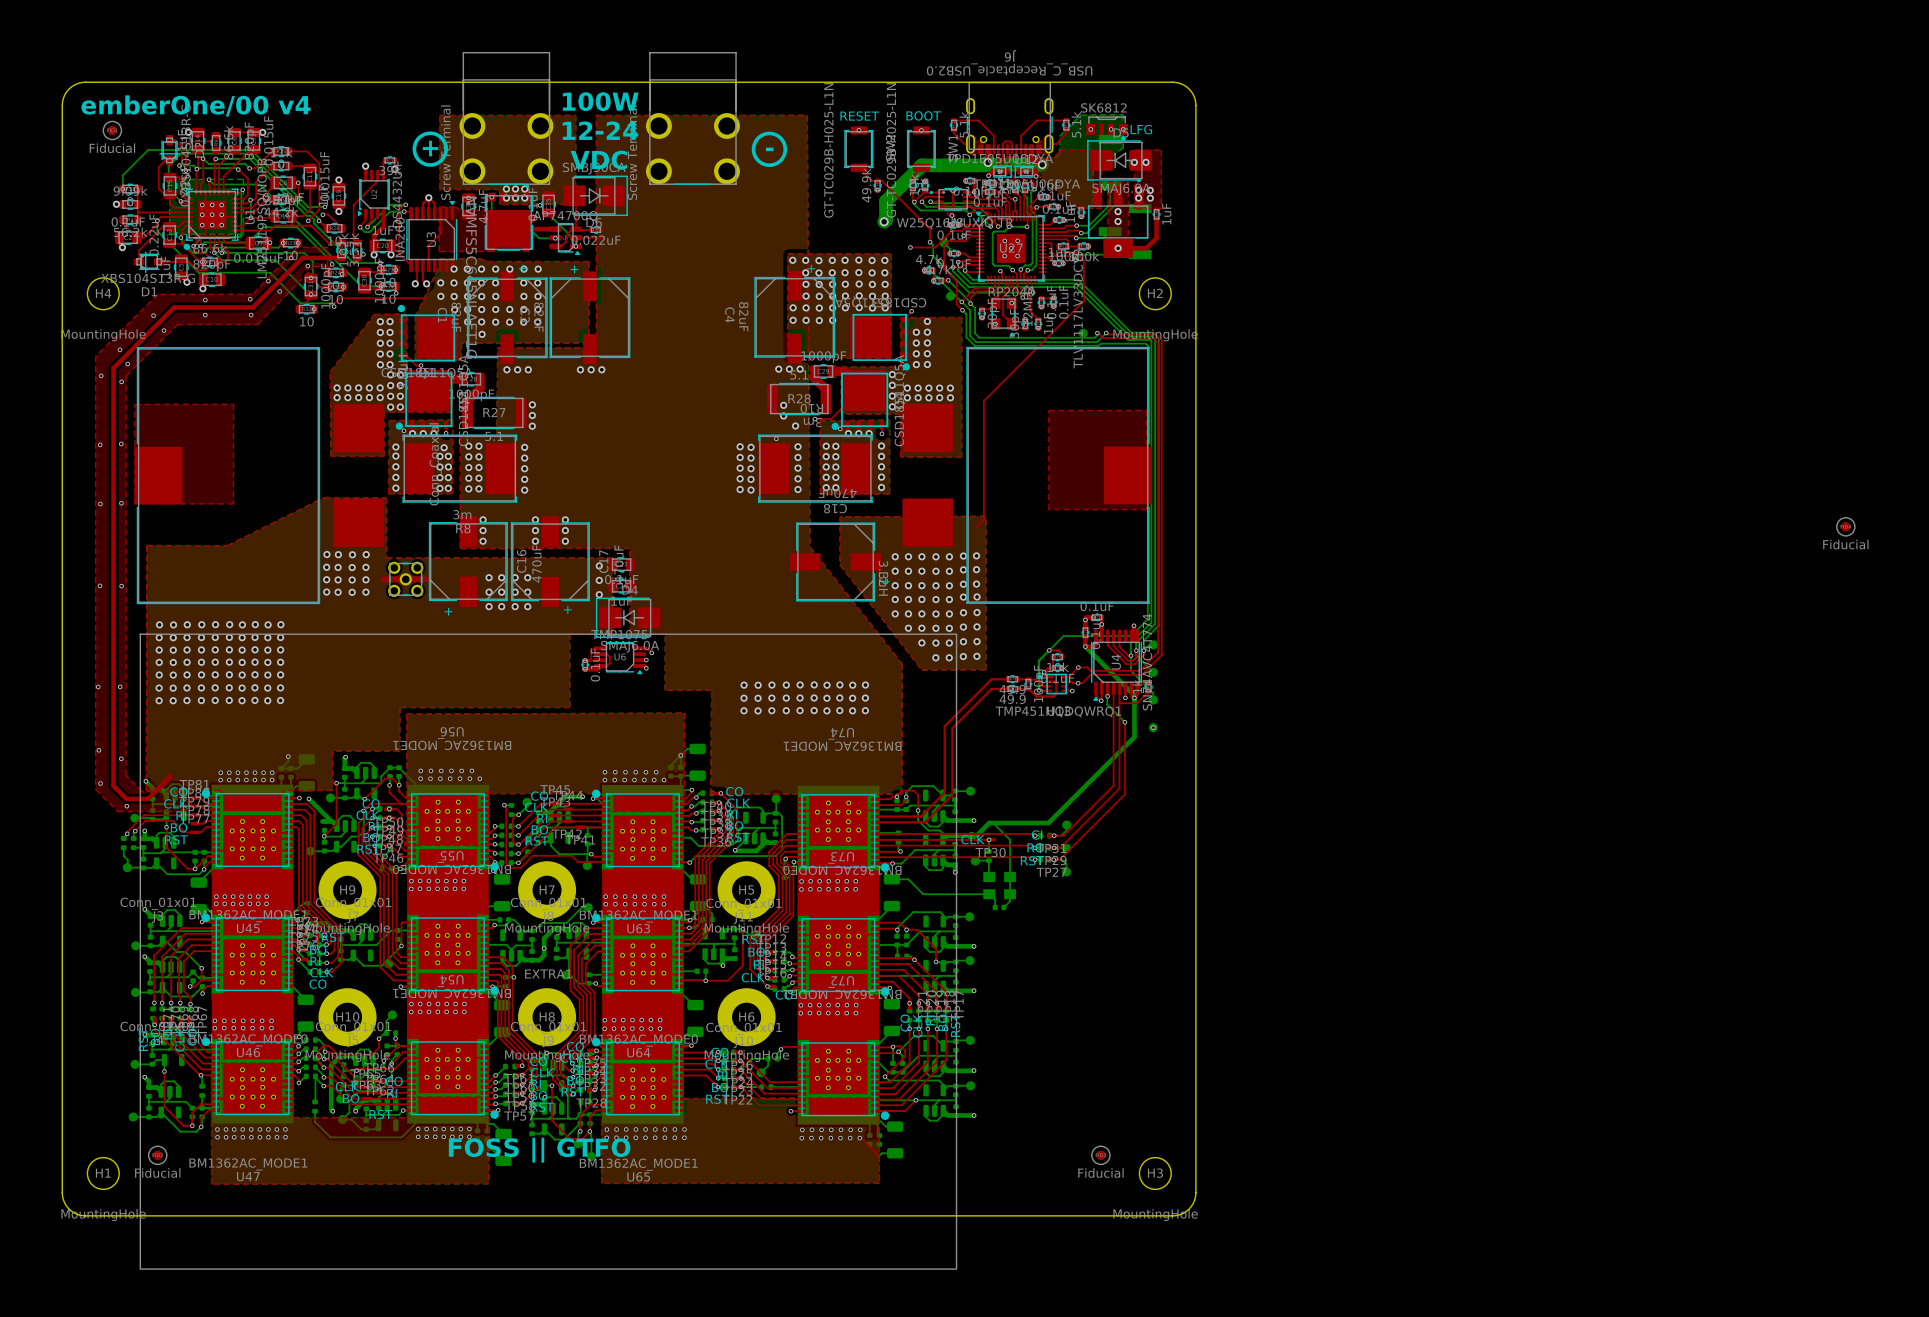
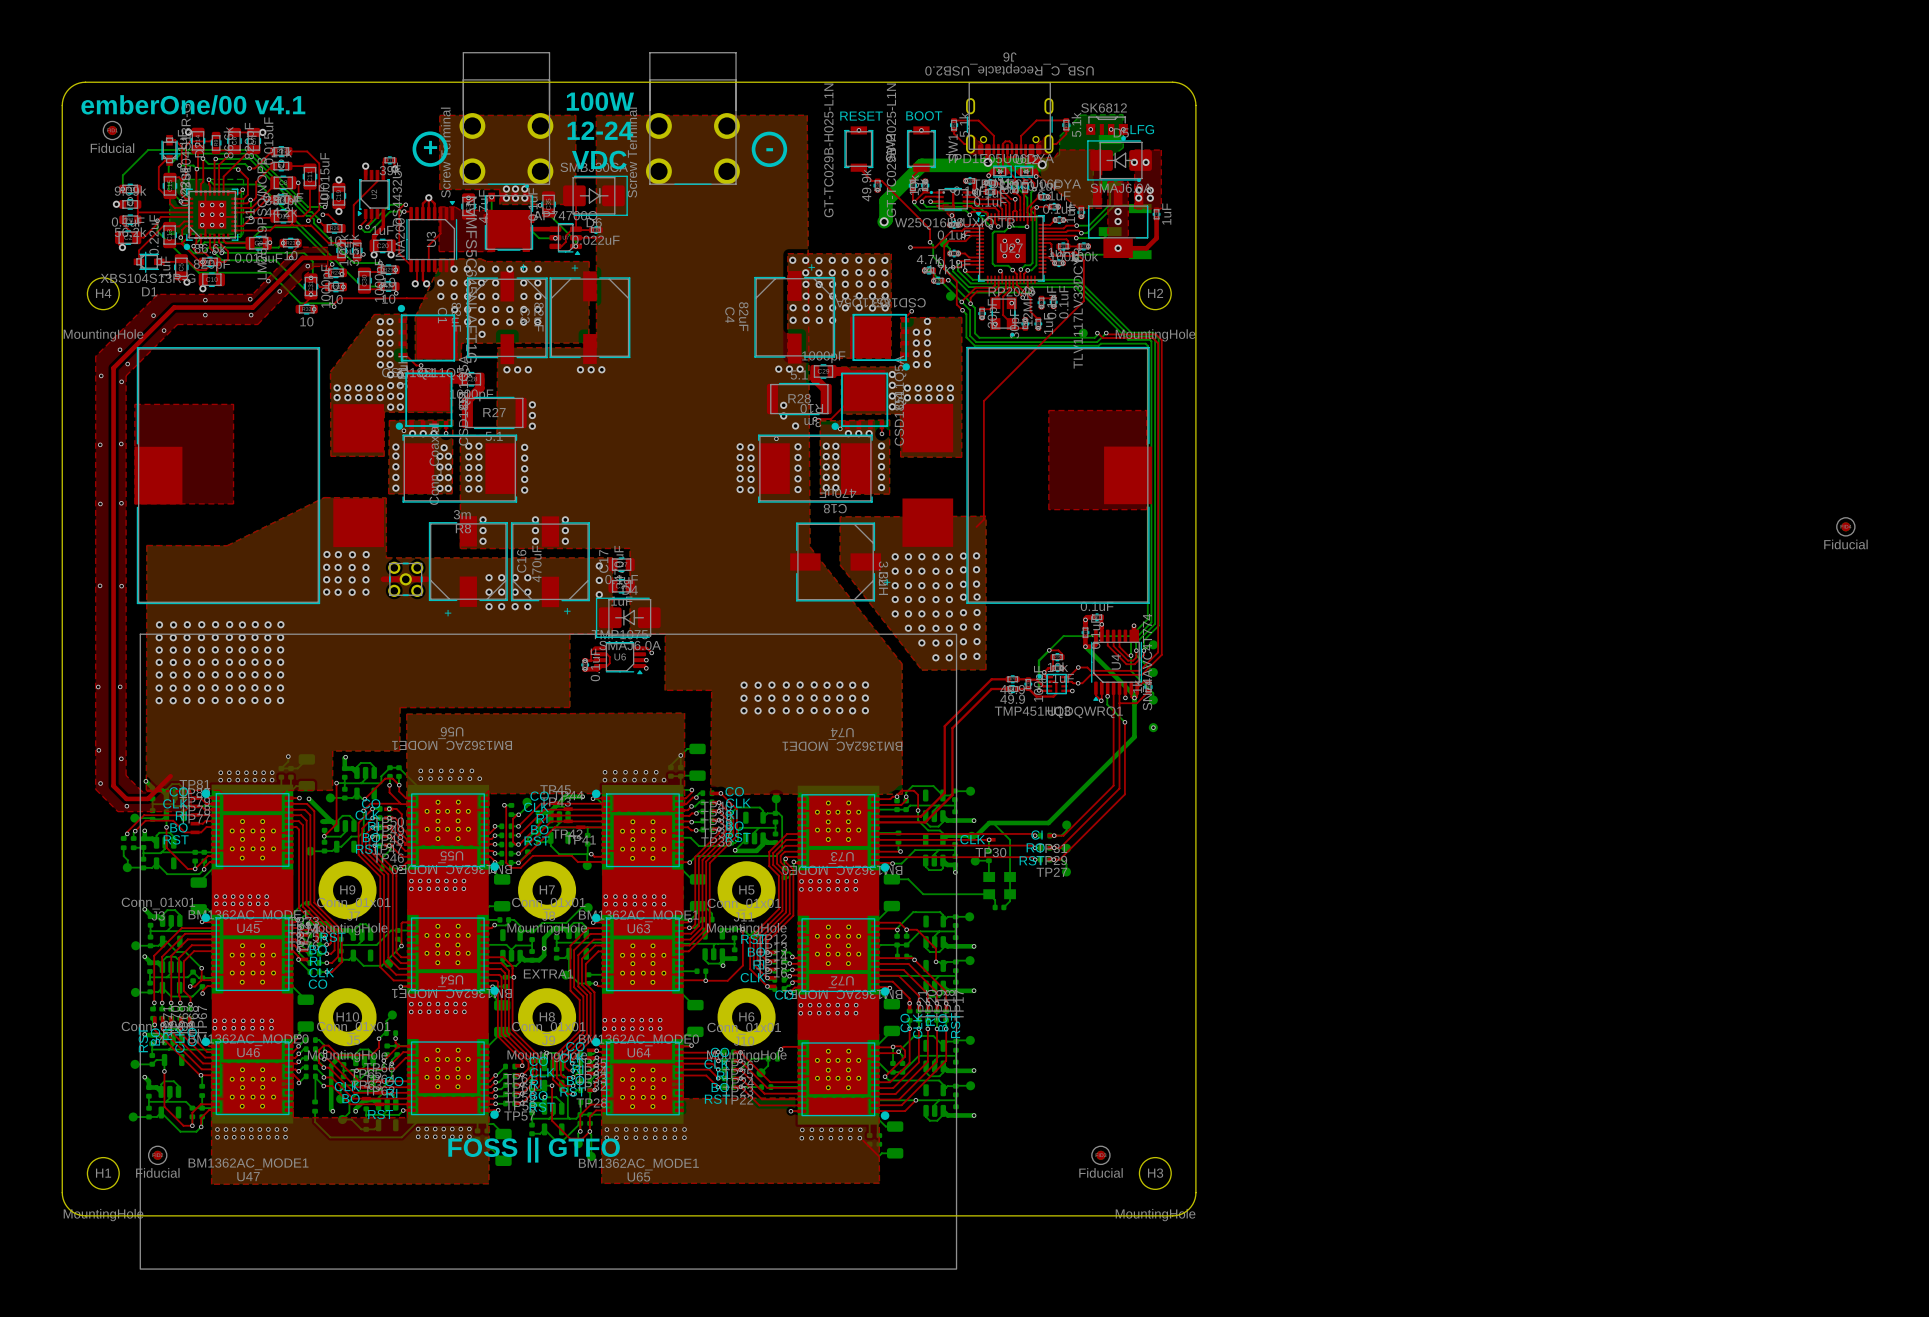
text: emberOne/00 v4 (196, 105) -> emberOne/00 v4.1 (193, 104)

